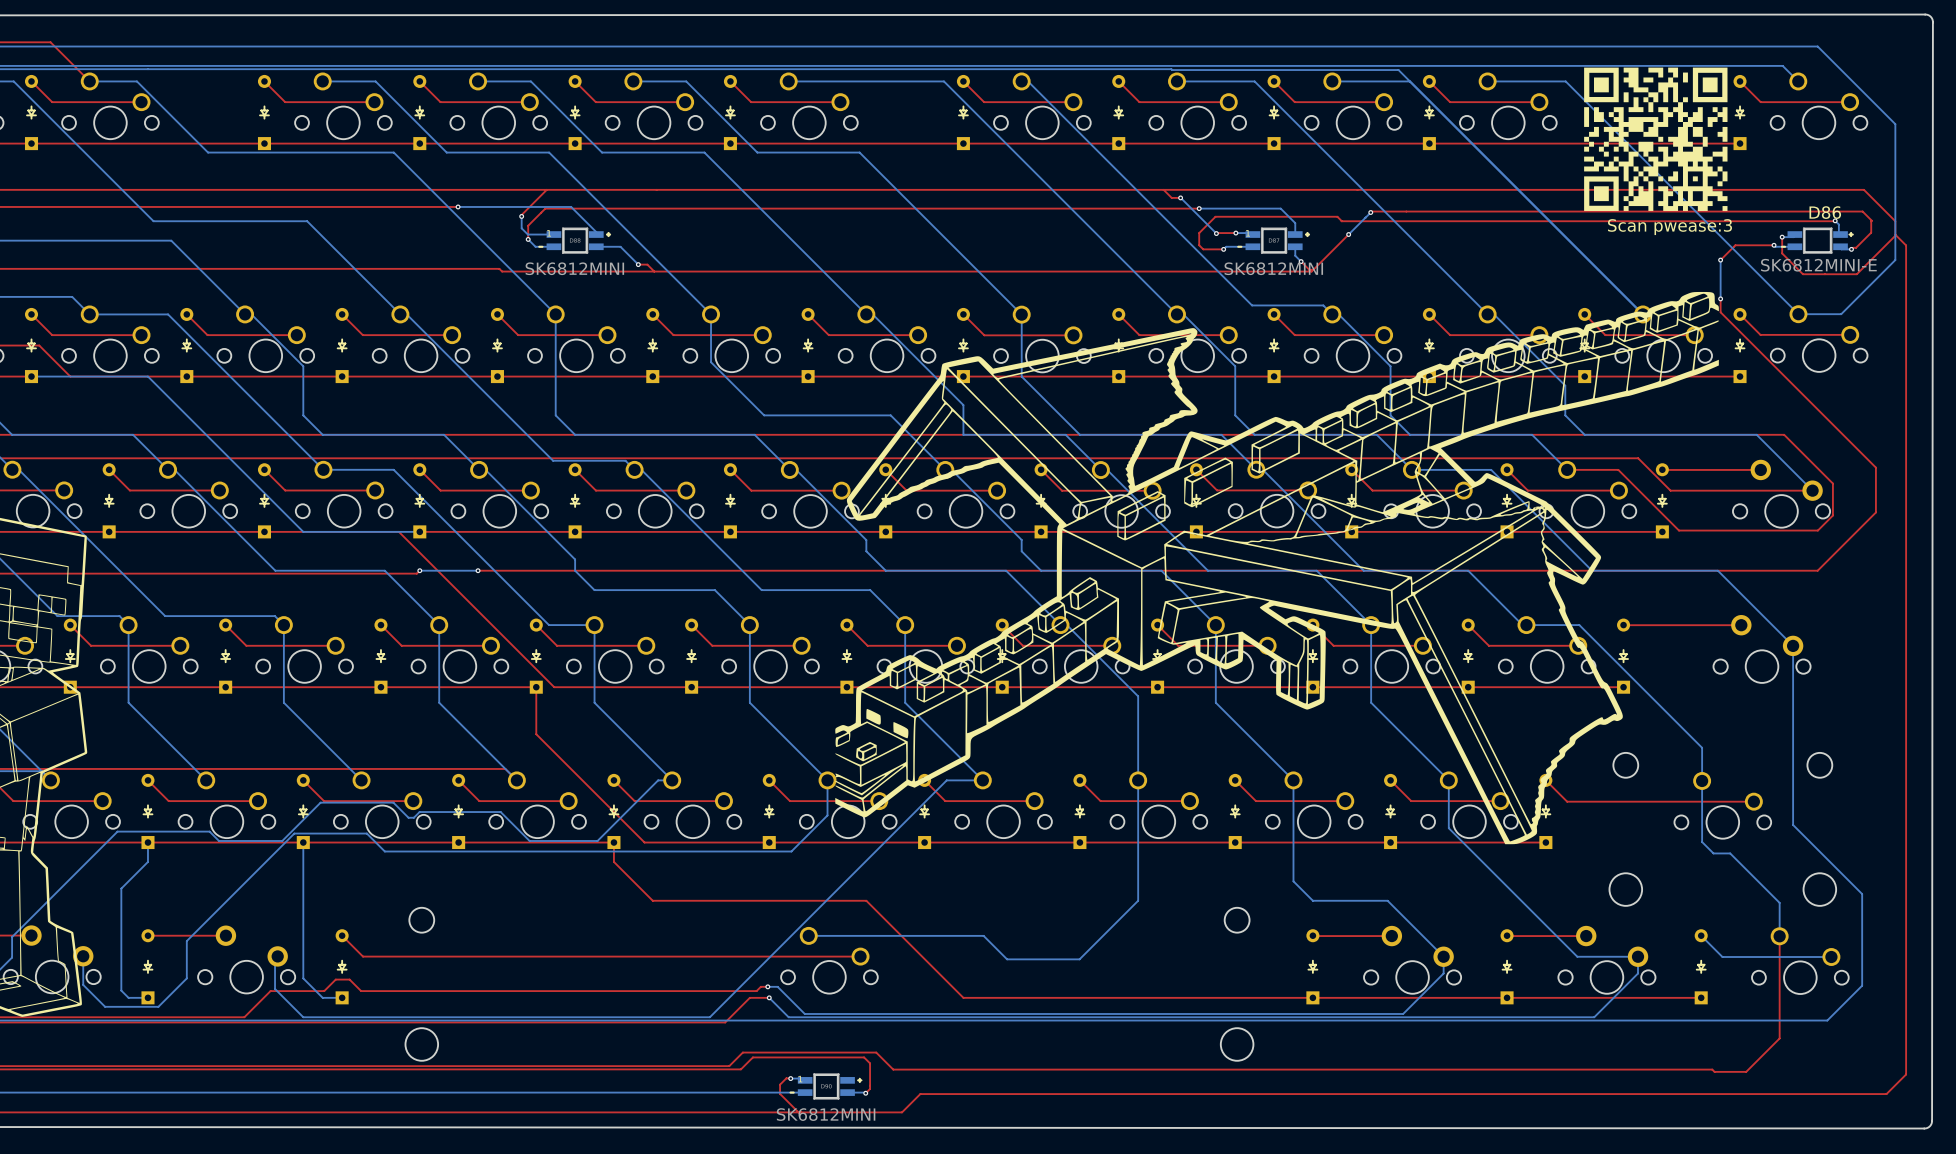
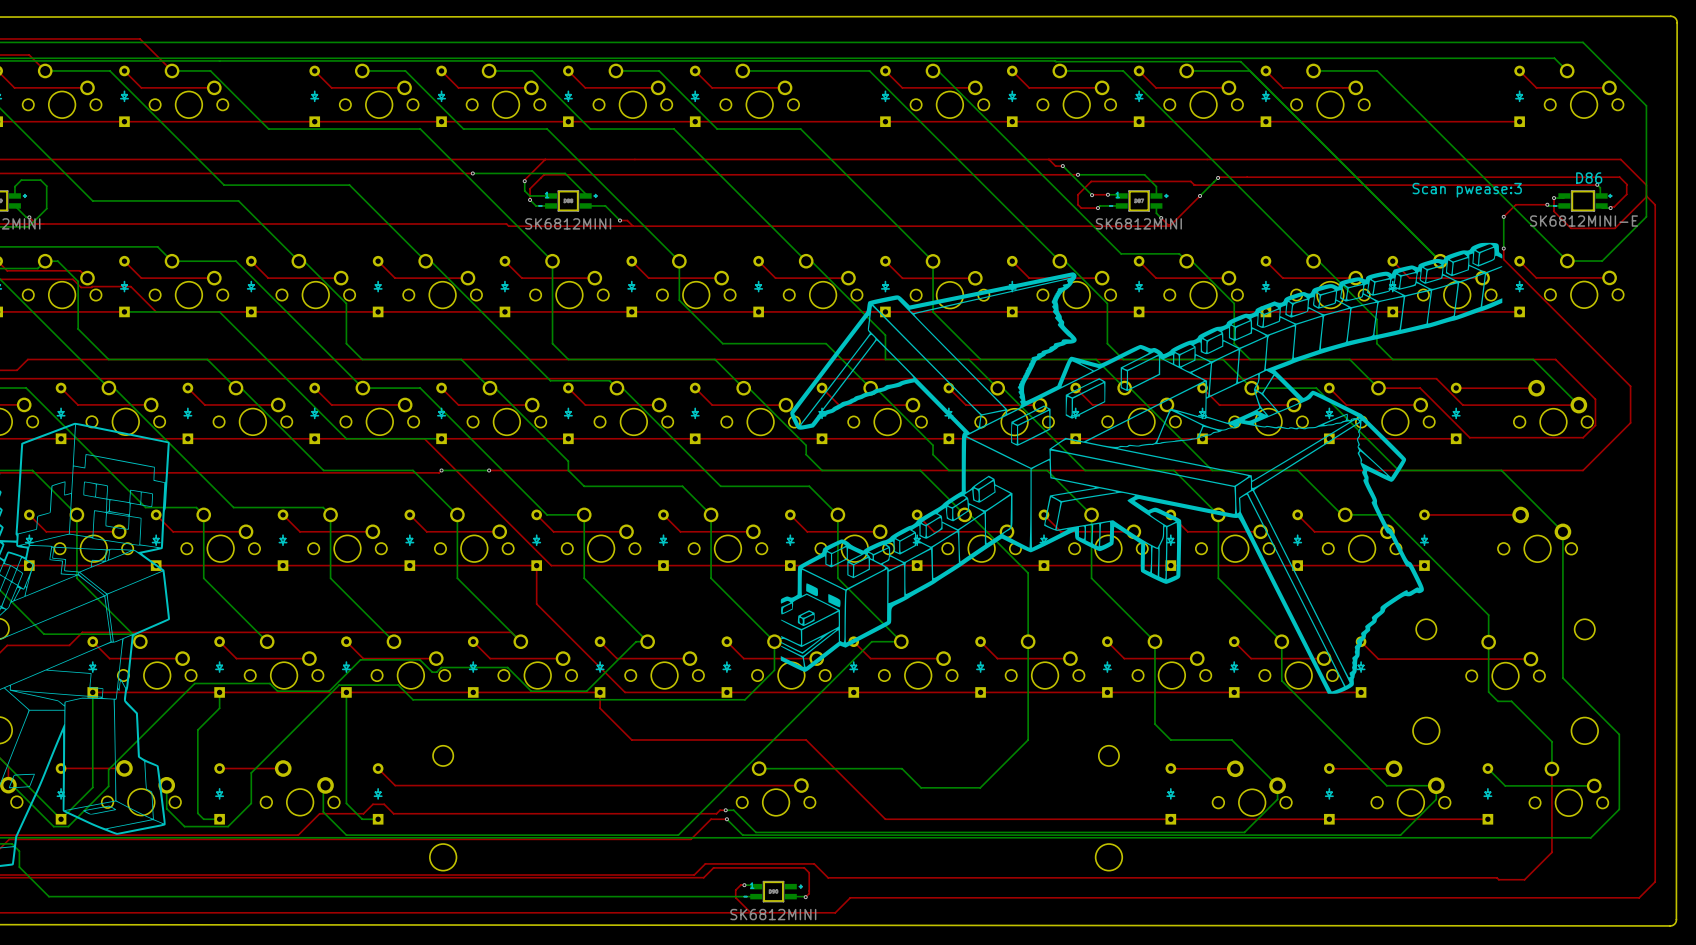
drawing: [1584, 67, 1728, 211] -> none

